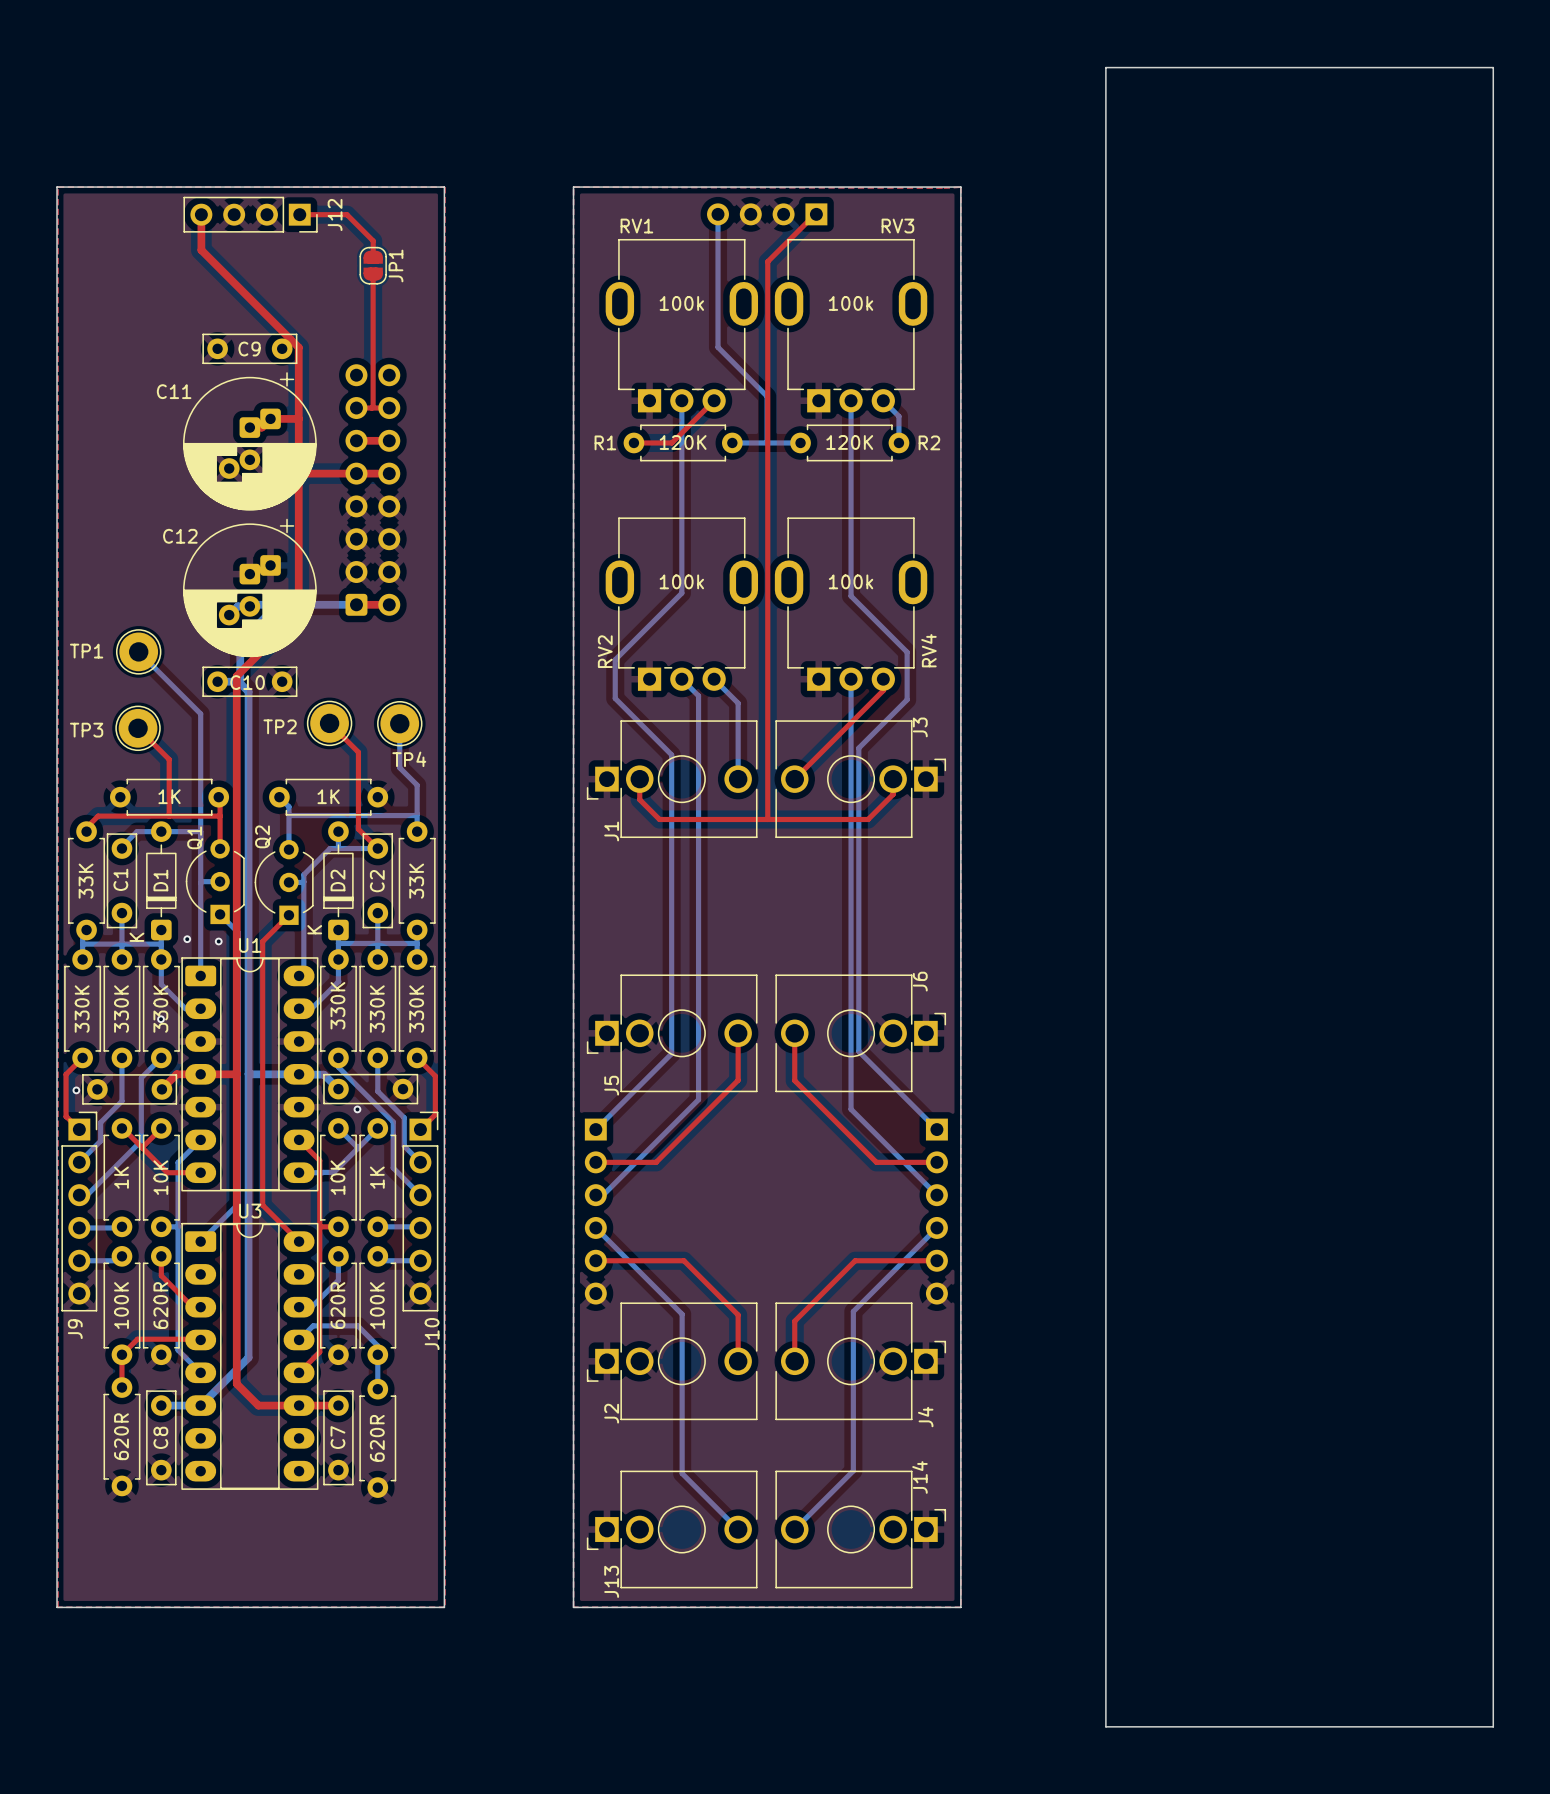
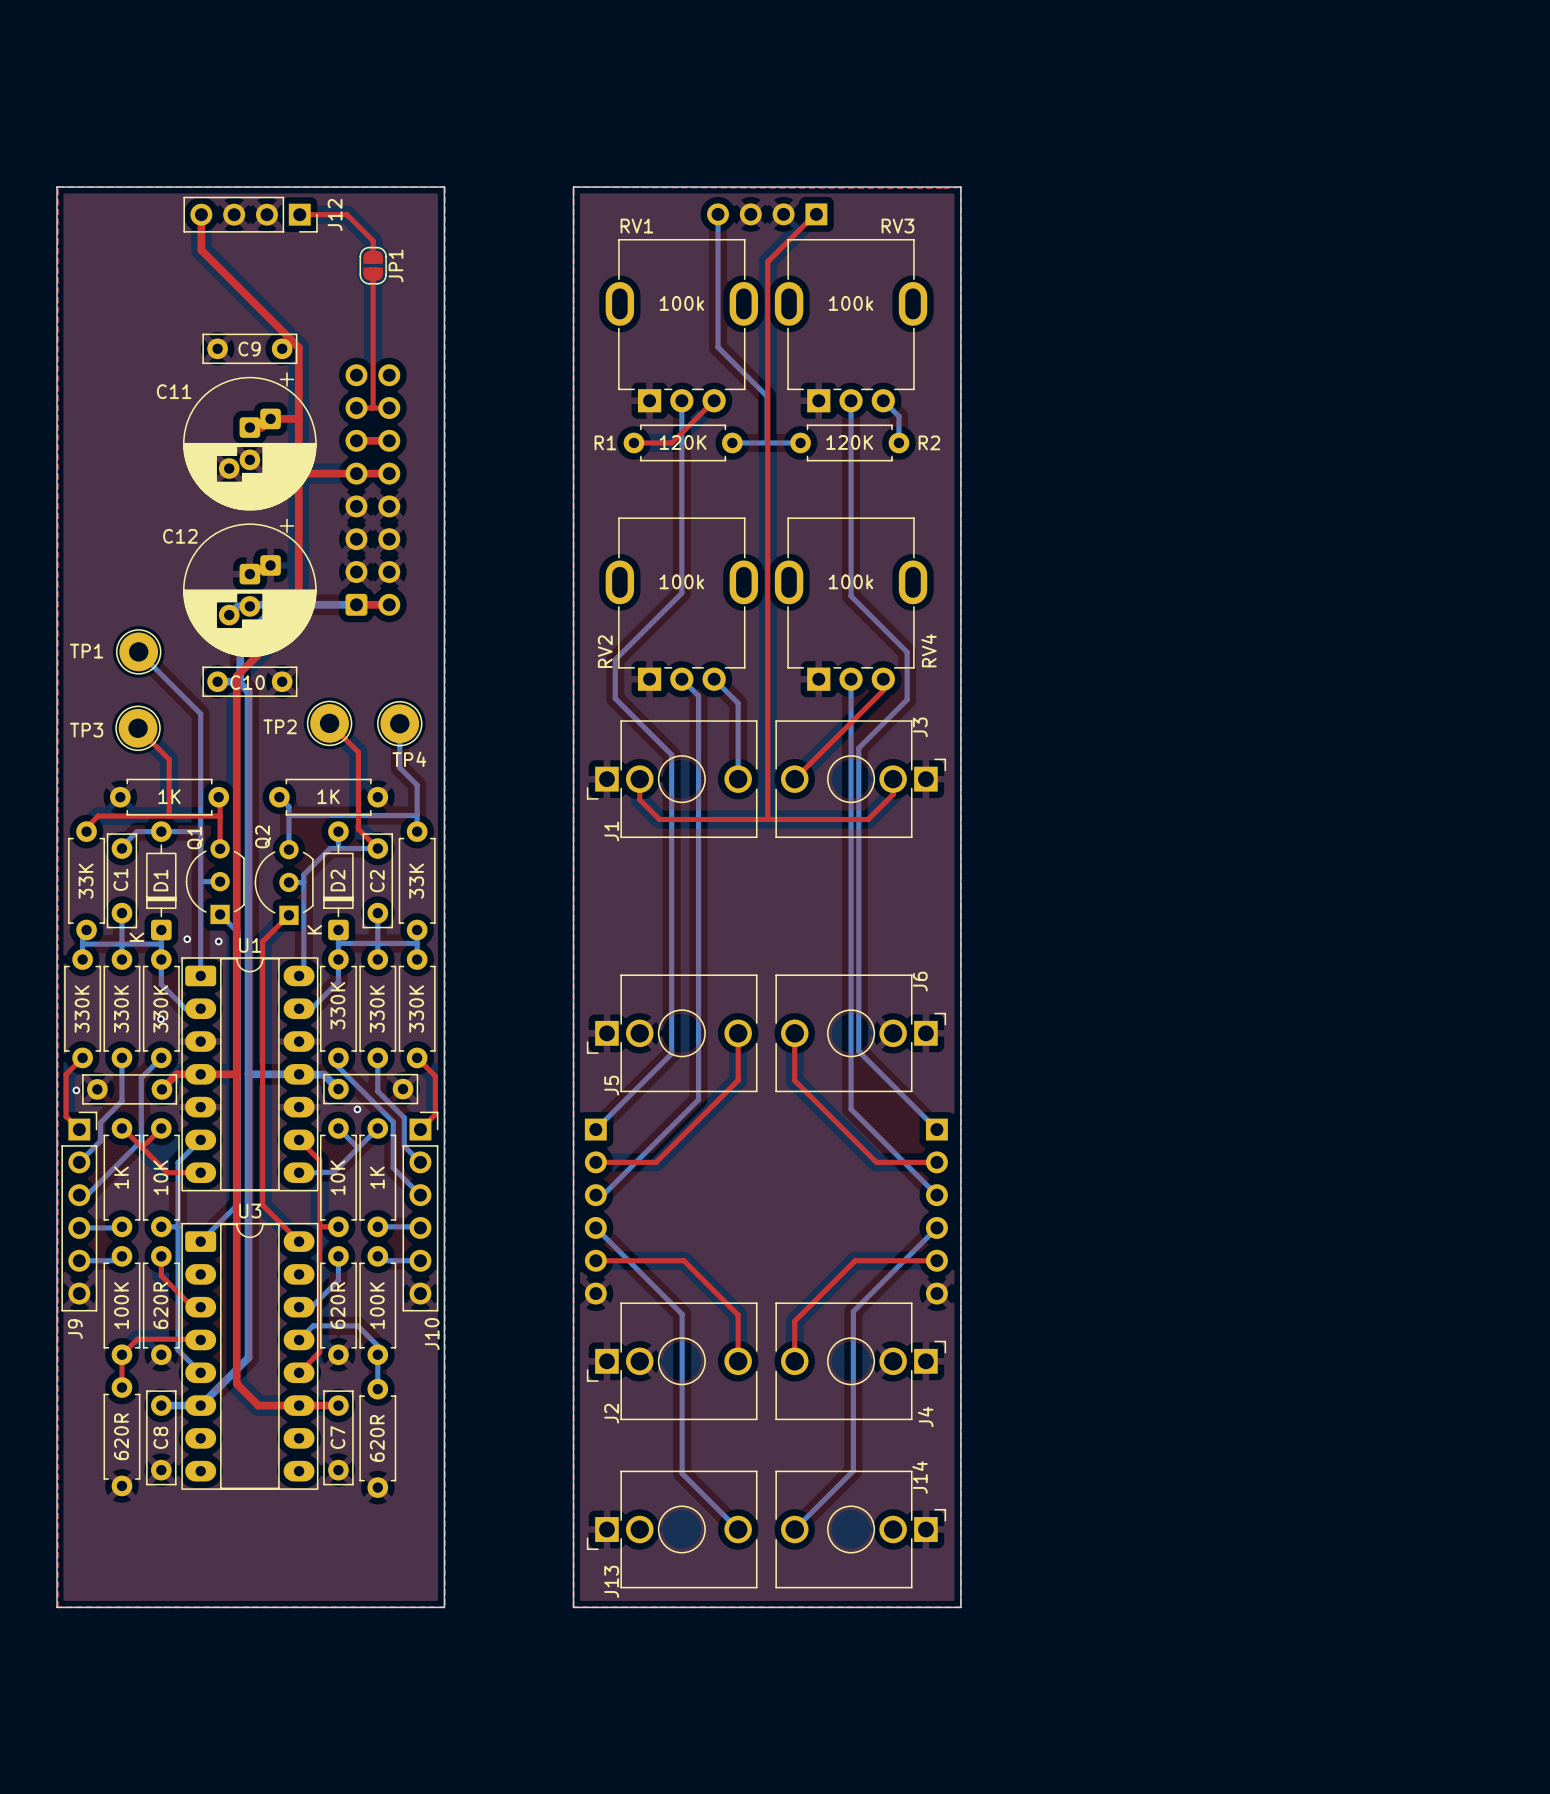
board edge: (1105, 67) (1493, 67) (1493, 1726) (1105, 1726) (1105, 67) -> none

